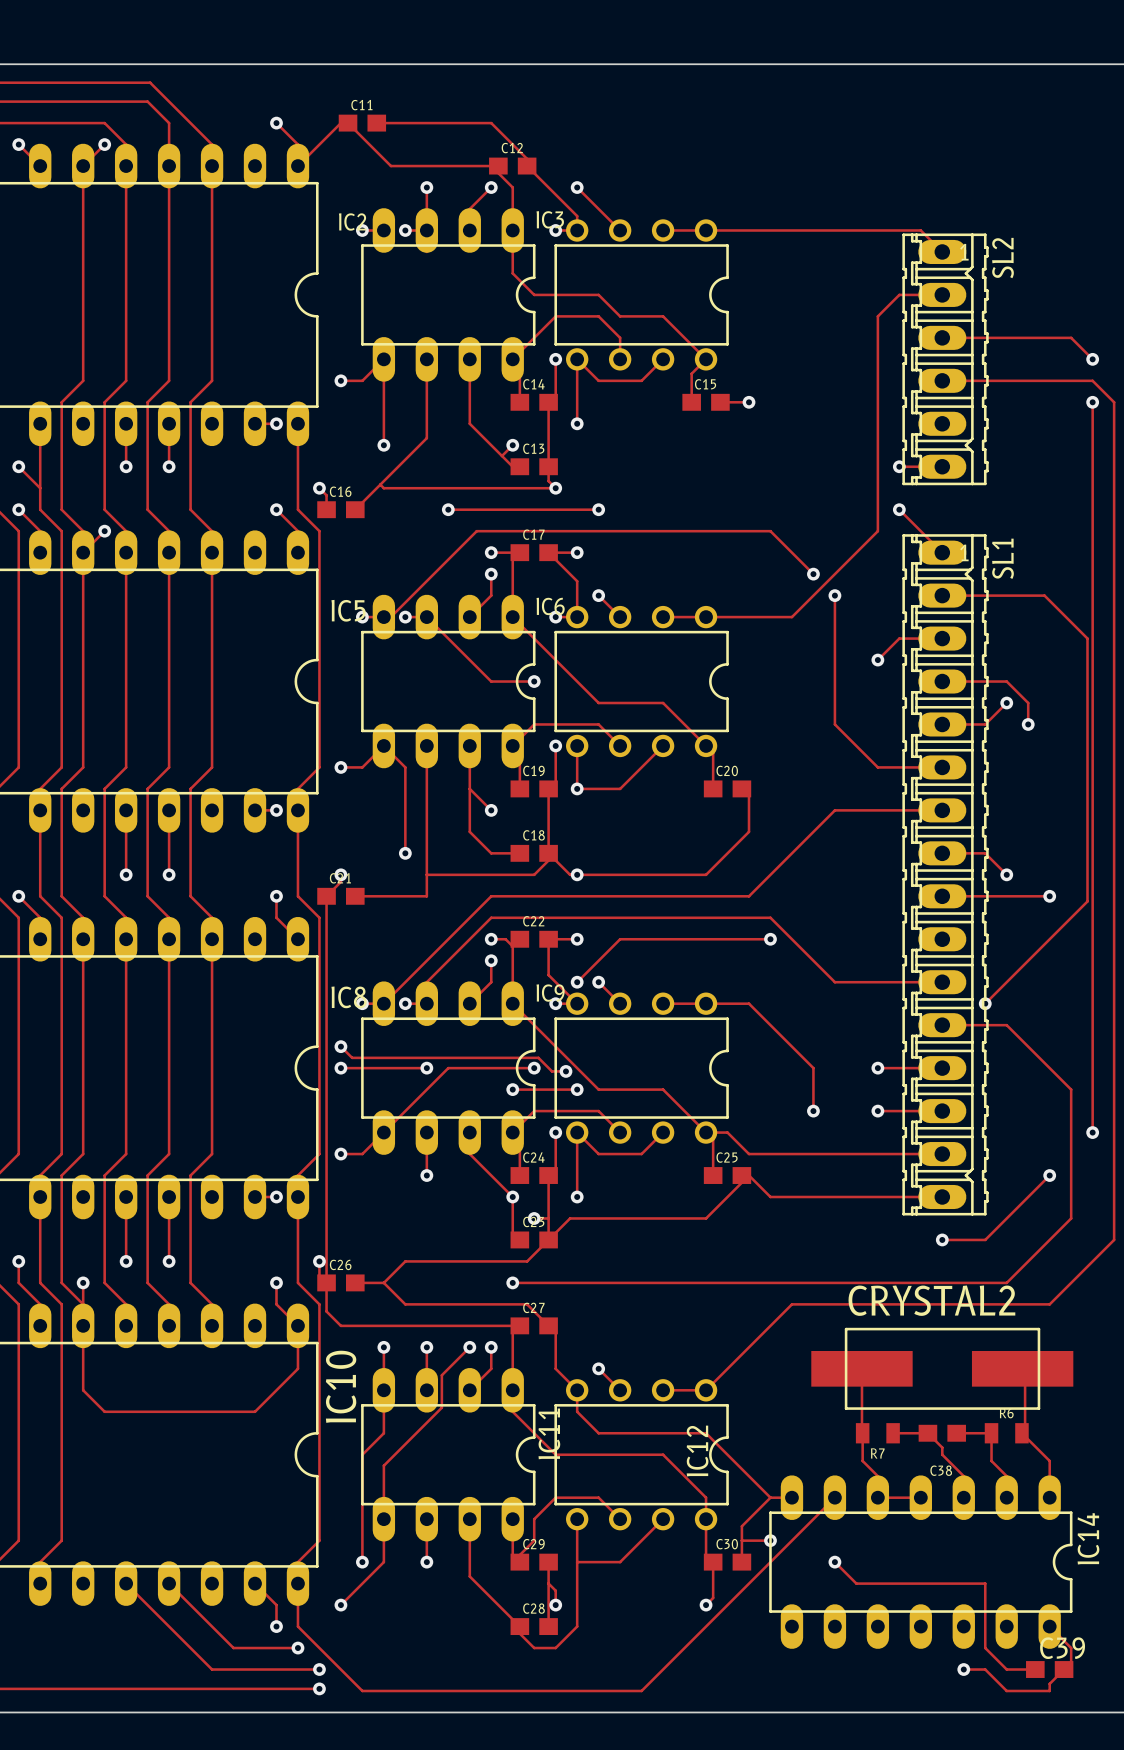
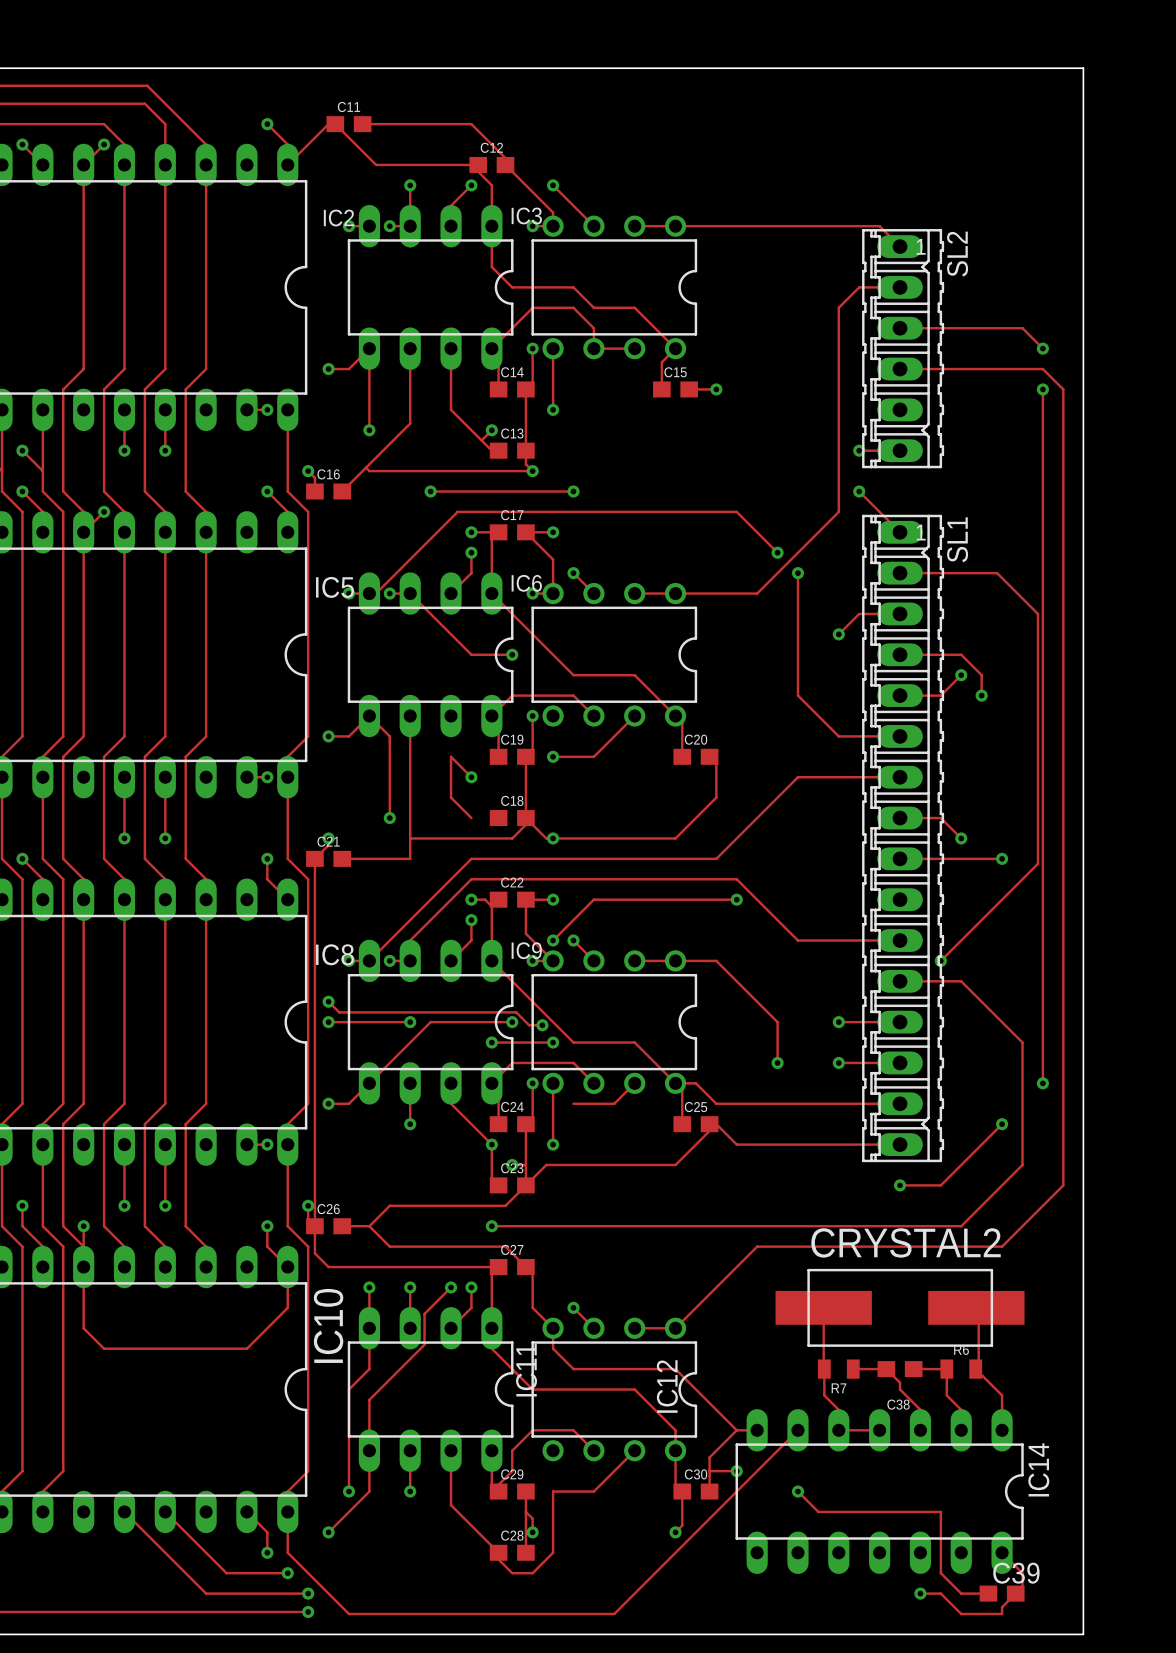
track: (577, 359) (598, 380) (641, 380) (663, 359) -> (593, 348) (634, 348)
track: (469, 745) (469, 788) -> none
track: (577, 745) (577, 788) -> none
track: (491, 853) (519, 853) -> none
track: (577, 1132) (598, 1154) -> none
track: (577, 1519) (577, 1562) -> none

